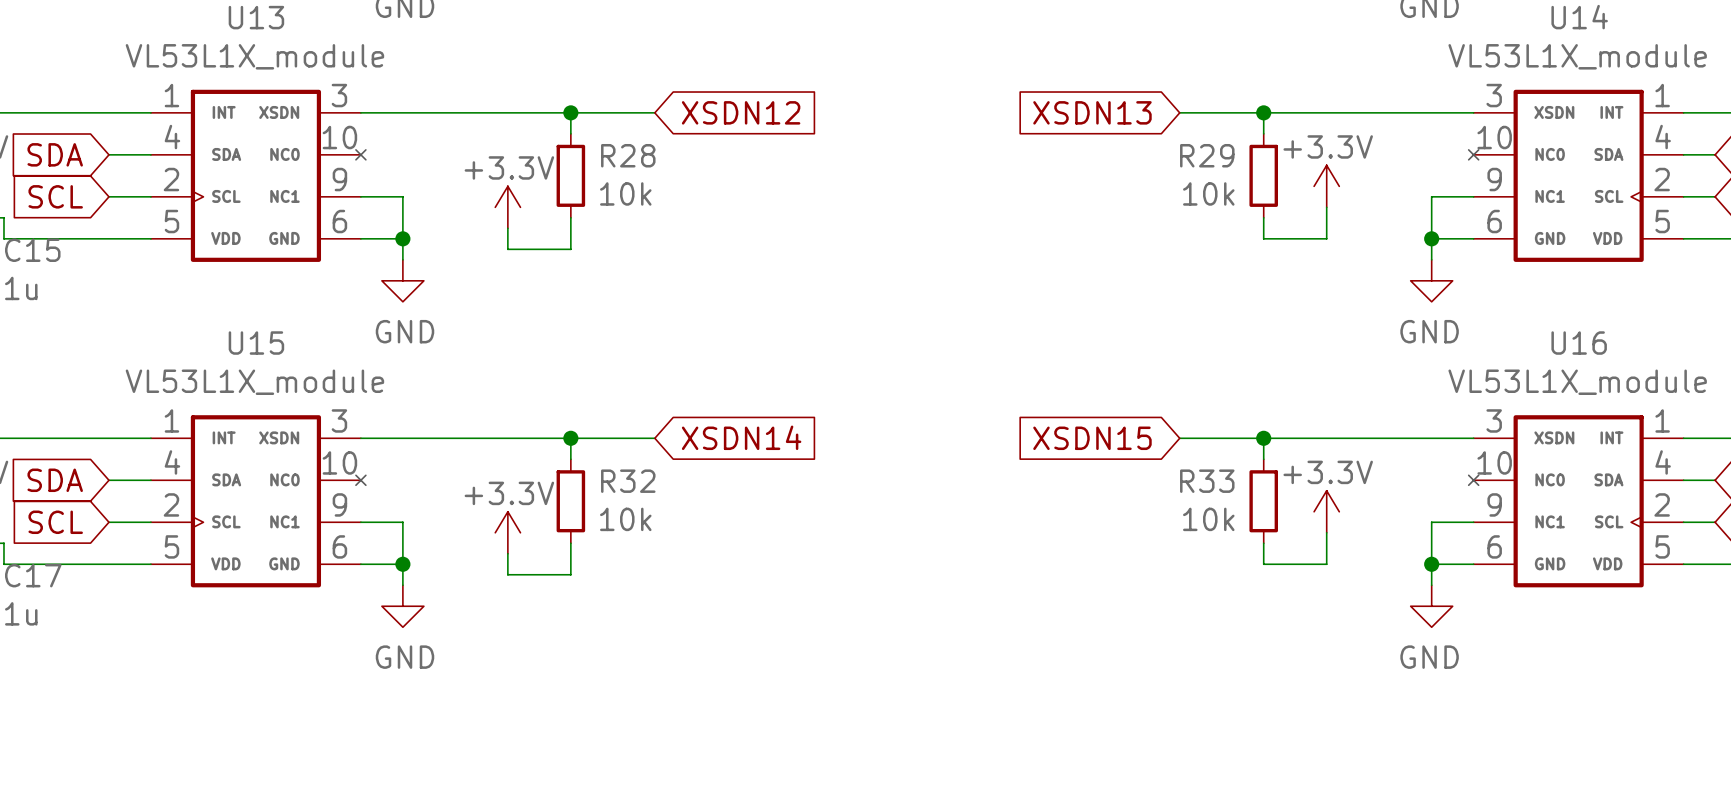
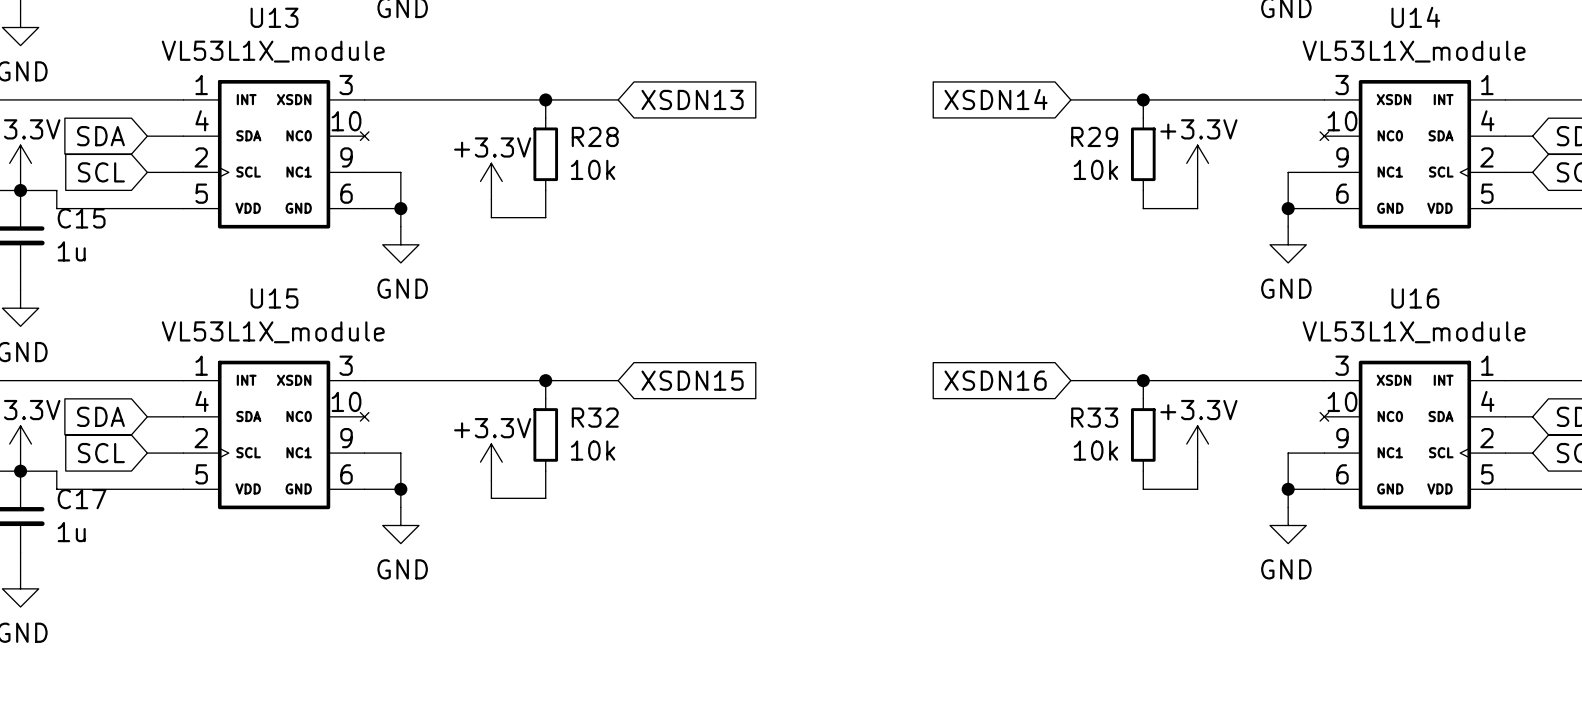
global label: XSDN12 (741, 112) -> XSDN13 (692, 99)
global label: XSDN13 (1092, 112) -> XSDN14 (996, 99)
global label: XSDN14 (741, 437) -> XSDN15 (692, 380)
global label: XSDN15 (1092, 438) -> XSDN16 (995, 380)

